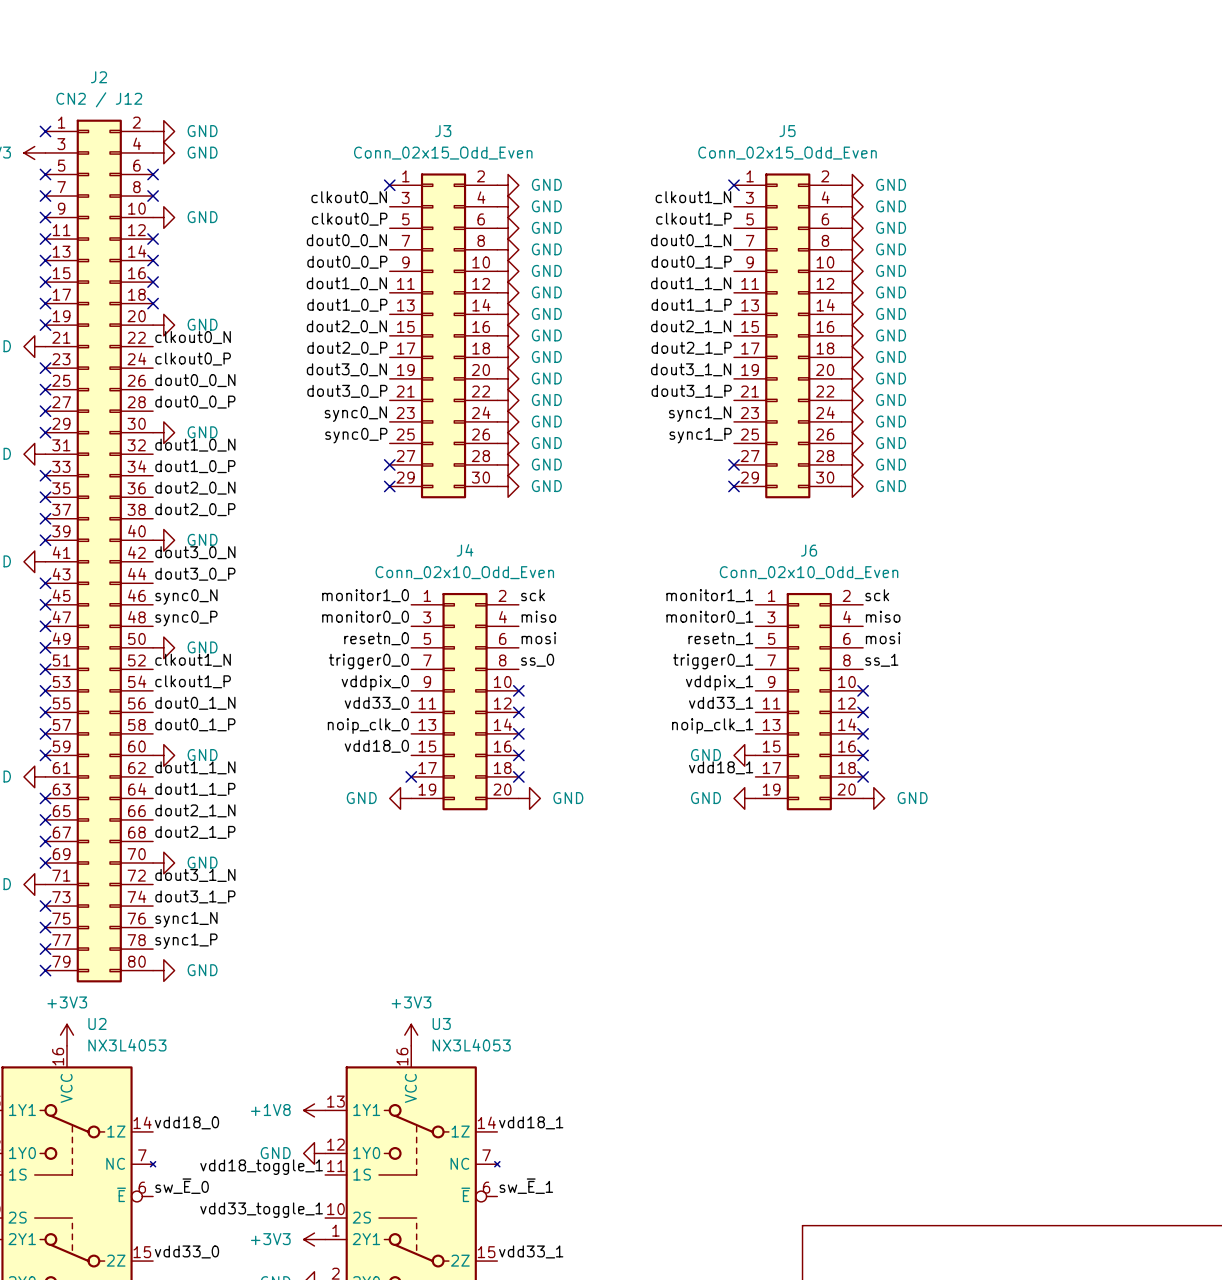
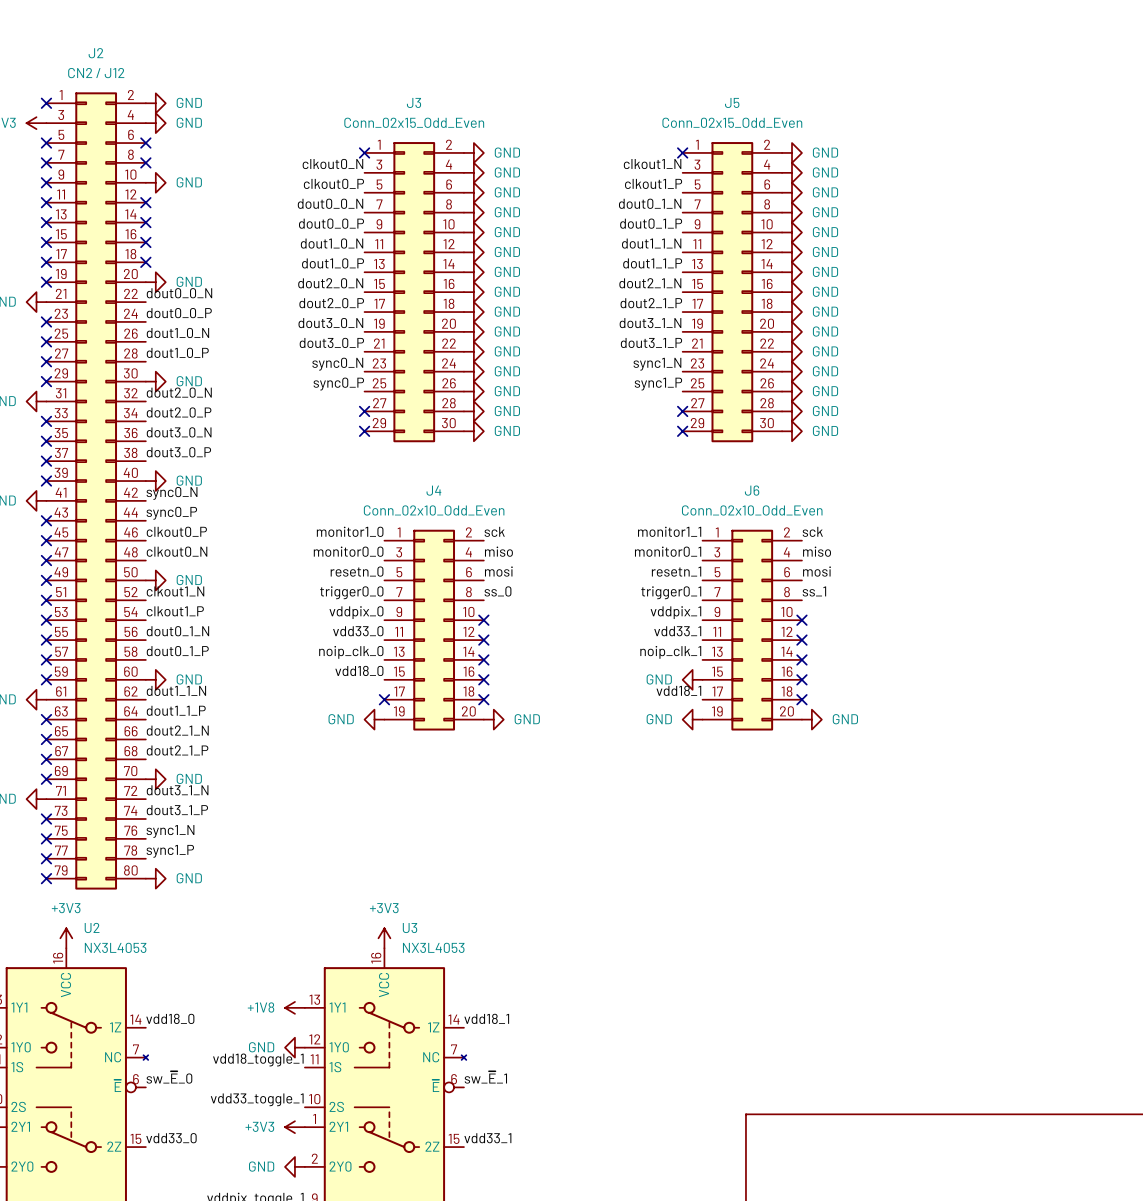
label: clkout0_N (193, 337) -> dout0_0_N (179, 293)
label: clkout0_P (193, 359) -> dout0_0_P (179, 313)
label: dout0_0_N (195, 380) -> dout1_0_N (177, 332)
label: dout0_0_P (195, 402) -> dout1_0_P (177, 352)
label: dout1_0_N (195, 445) -> dout2_0_N (179, 392)
label: dout1_0_P (195, 466) -> dout2_0_P (179, 412)
label: dout2_0_N (195, 488) -> dout3_0_N (179, 432)
label: dout2_0_P (195, 509) -> dout3_0_P (178, 452)
label: dout3_0_N (195, 552) -> sync0_N (172, 493)
label: dout3_0_P (195, 574) -> sync0_P (171, 513)
label: sync0_N (186, 597) -> clkout0_P (176, 531)
label: sync0_P (186, 618) -> clkout0_N (177, 551)

